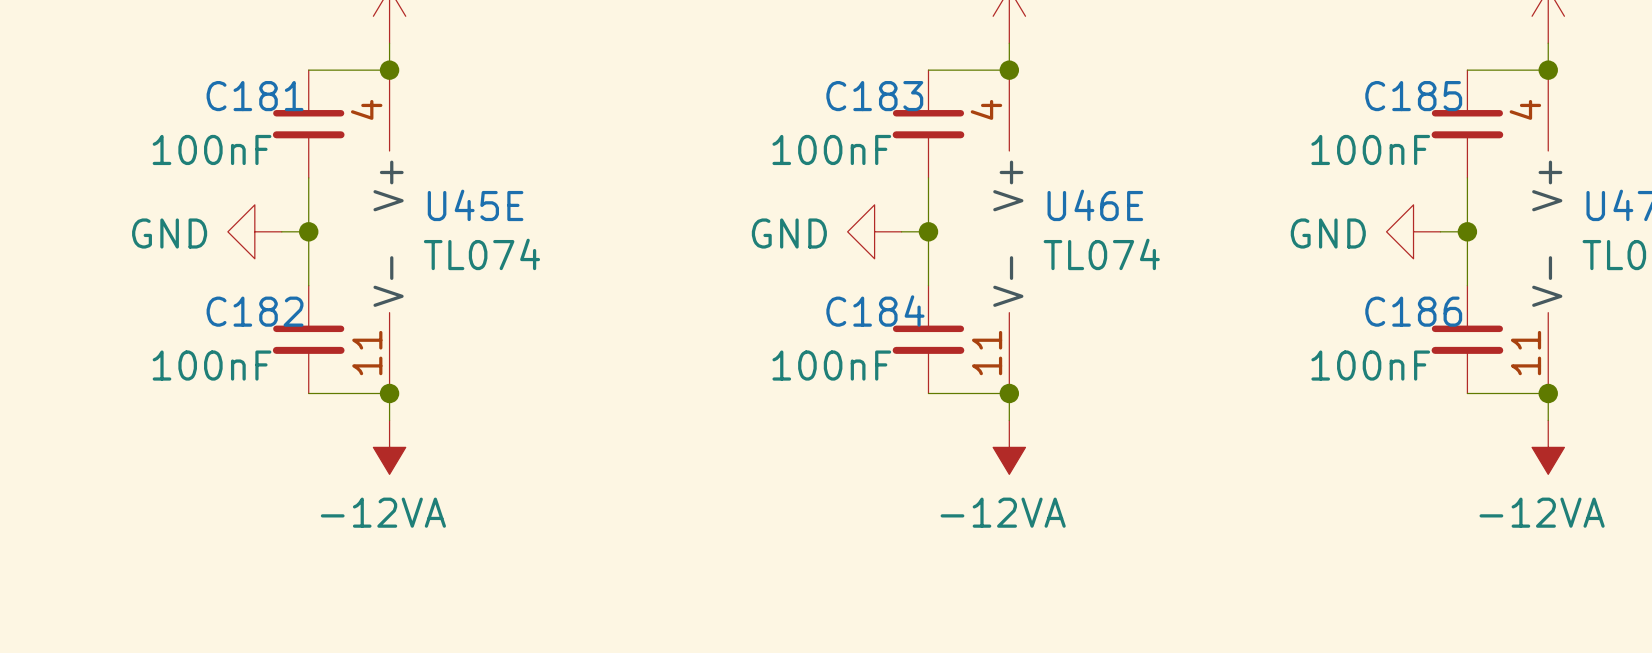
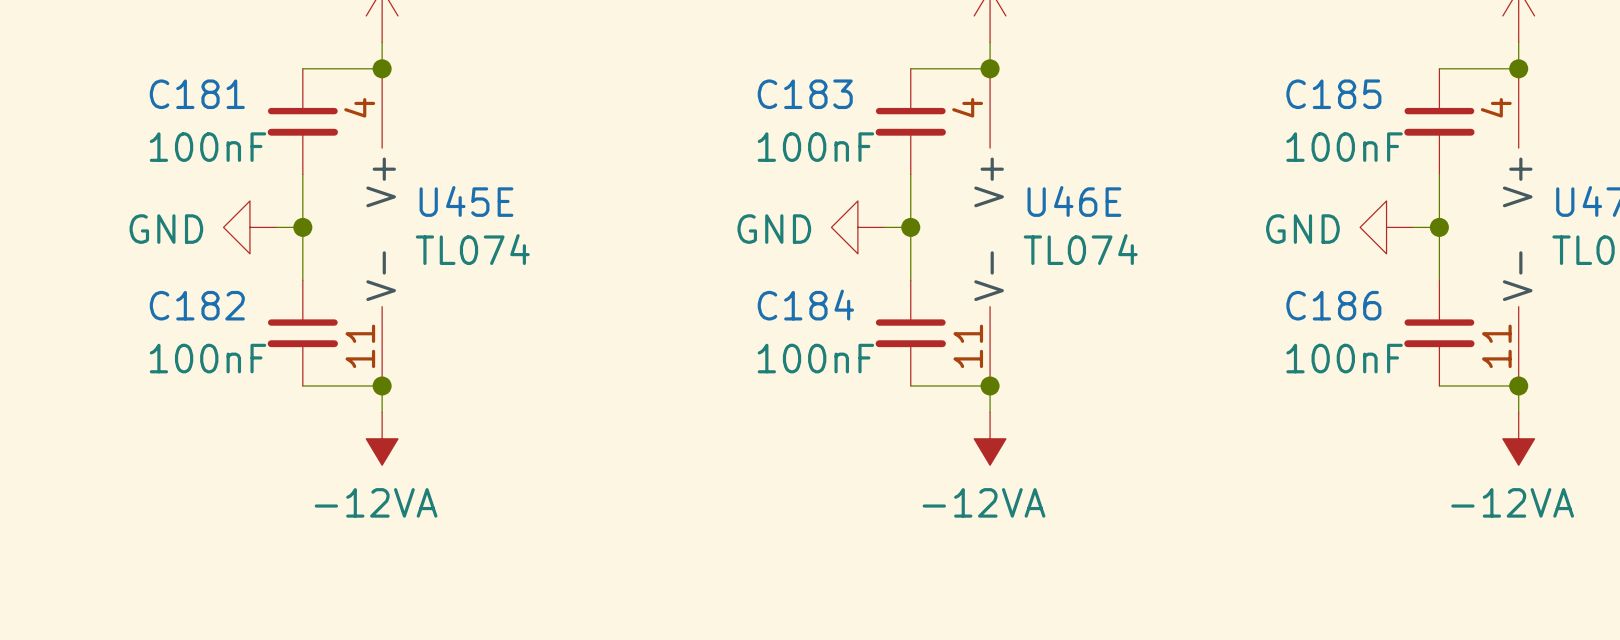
C181 name position: C181 (255, 96) -> C181 (197, 94)
C183 name position: C183 (874, 96) -> C183 (805, 94)
C185 name position: C185 (1413, 96) -> C185 (1333, 94)
C182 name position: C182 (255, 311) -> C182 (197, 305)
C184 name position: C184 (875, 311) -> C184 (805, 305)
C186 name position: C186 (1413, 311) -> C186 (1333, 305)

